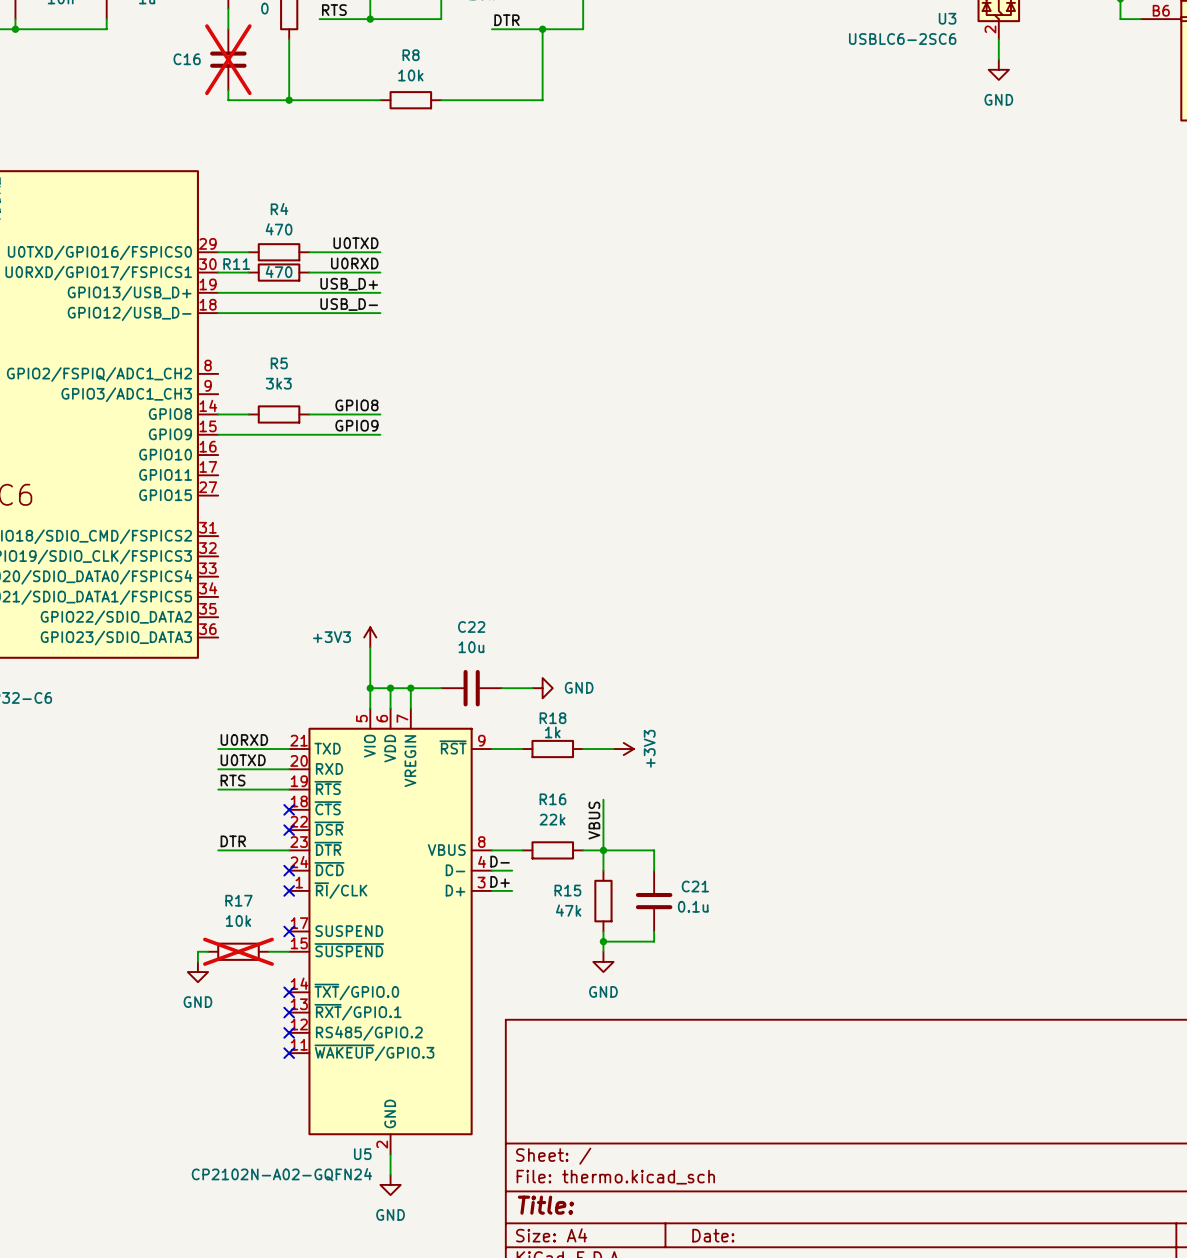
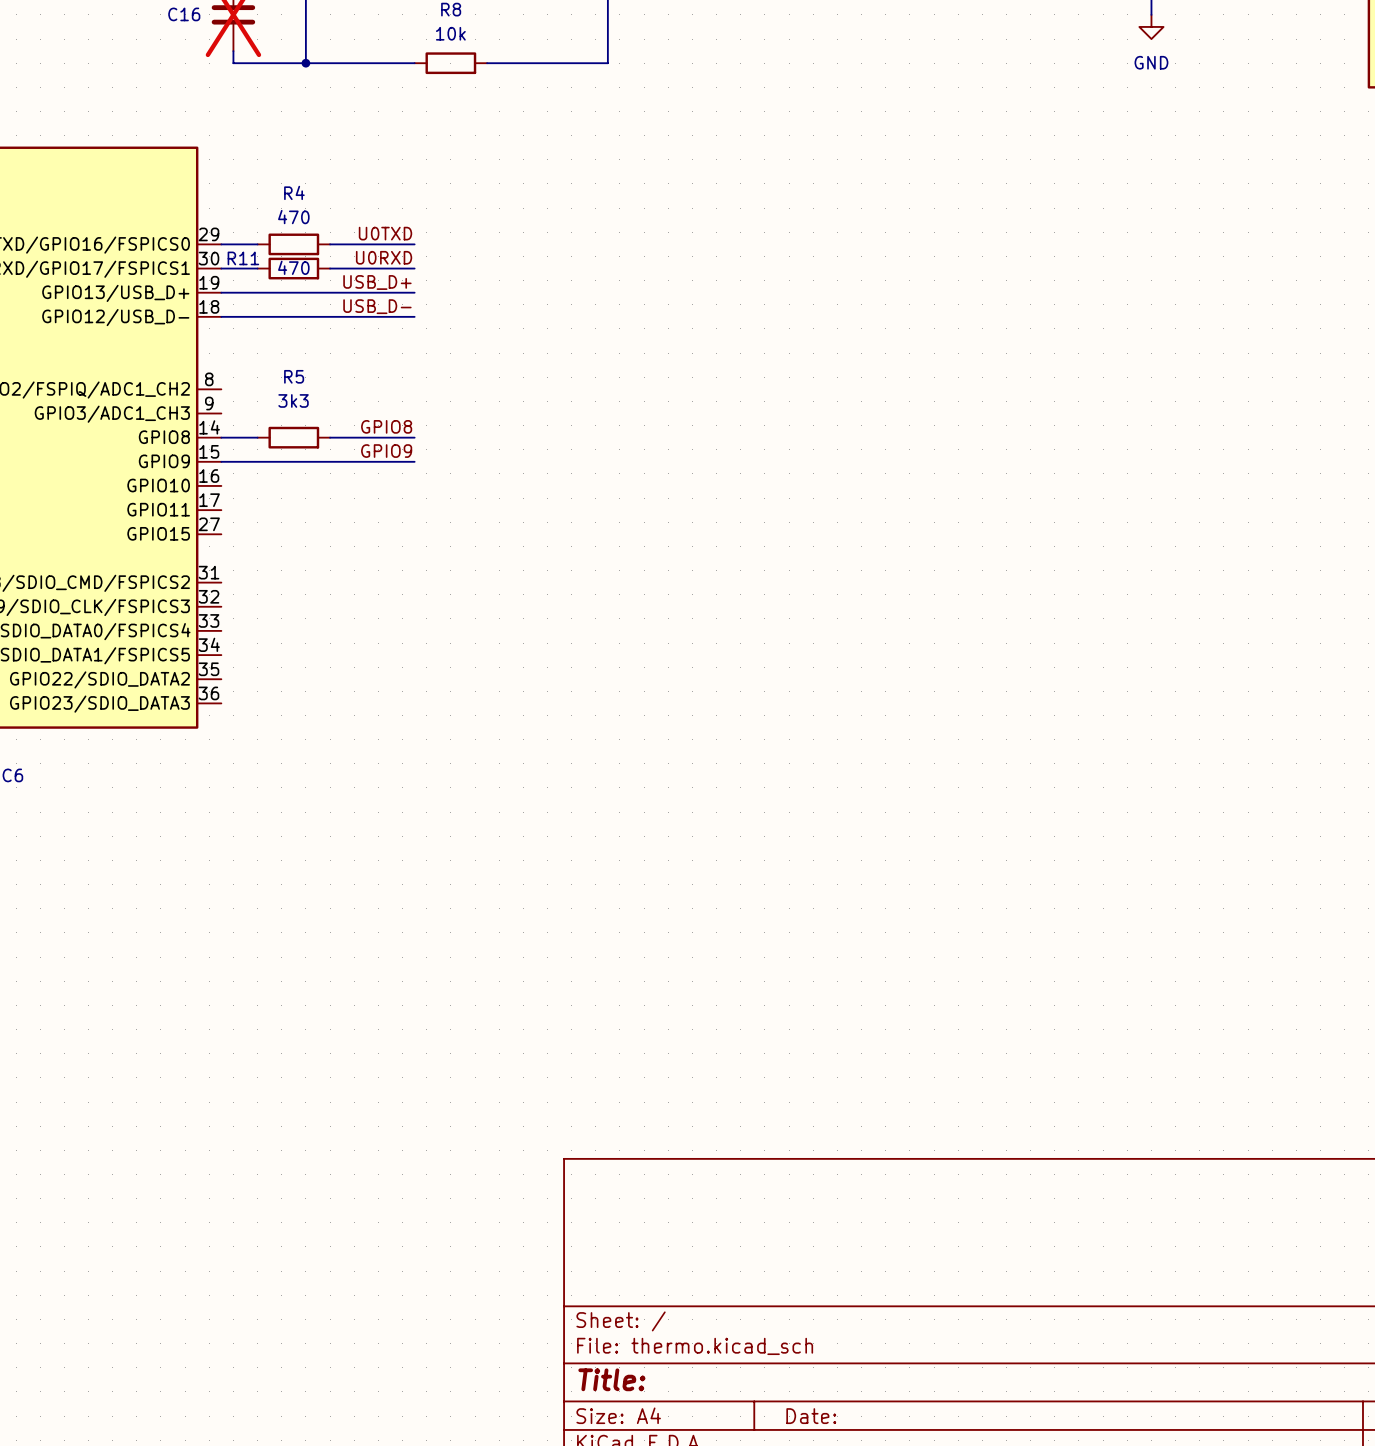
power symbol: +3V3 (370, 637) -> none
wire: (370, 647) (370, 708) -> none
wire: (370, 688) (441, 688) -> none
junction: (370, 688) -> none
wire: (390, 688) (390, 708) -> none
junction: (390, 688) -> none
wire: (410, 688) (410, 708) -> none
junction: (410, 688) -> none
C22: 10u (471, 688) -> none
wire: (502, 688) (532, 688) -> none
power symbol: GND (542, 688) -> none
label: U0RXD (244, 739) -> none
wire: (218, 749) (289, 749) -> none
wire: (491, 749) (522, 749) -> none
R18: 1k (552, 749) -> none
wire: (583, 749) (613, 749) -> none
power symbol: +3V3 (623, 749) -> none
label: U0TXD (243, 760) -> none
wire: (218, 769) (289, 769) -> none
label: RTS (233, 780) -> none
wire: (218, 789) (289, 789) -> none
wire: (603, 799) (603, 870) -> none
no-connect mark: (289, 809) -> none
label: VBUS (594, 820) -> none
no-connect mark: (289, 830) -> none
label: DTR (233, 841) -> none
wire: (218, 850) (289, 850) -> none
wire: (491, 850) (522, 850) -> none
R16: 22k (552, 850) -> none
wire: (583, 850) (654, 850) (654, 870) -> none
junction: (603, 850) -> none
label: D- (500, 861) -> none
no-connect mark: (289, 870) -> none
wire: (491, 870) (512, 870) -> none
label: D+ (500, 881) -> none
no-connect mark: (289, 890) -> none
wire: (491, 890) (512, 890) -> none
R15: 47k (603, 901) -> none
C21: 0.1u (654, 901) -> none
no-connect mark: (289, 931) -> none
U5: CP2102N-A02-GQFN24 (390, 931) -> none
wire: (603, 931) (603, 951) -> none
wire: (654, 931) (654, 941) (603, 941) -> none
junction: (603, 941) -> none
wire: (208, 951) (197, 951) (197, 961) -> none
R17: 10k (238, 951) -> none
wire: (268, 951) (289, 951) -> none
power symbol: GND (603, 961) -> none
power symbol: GND (197, 972) -> none
no-connect mark: (289, 992) -> none
no-connect mark: (289, 1012) -> none
no-connect mark: (289, 1032) -> none
no-connect mark: (289, 1053) -> none
wire: (390, 1154) (390, 1174) -> none
power symbol: GND (390, 1184) -> none

